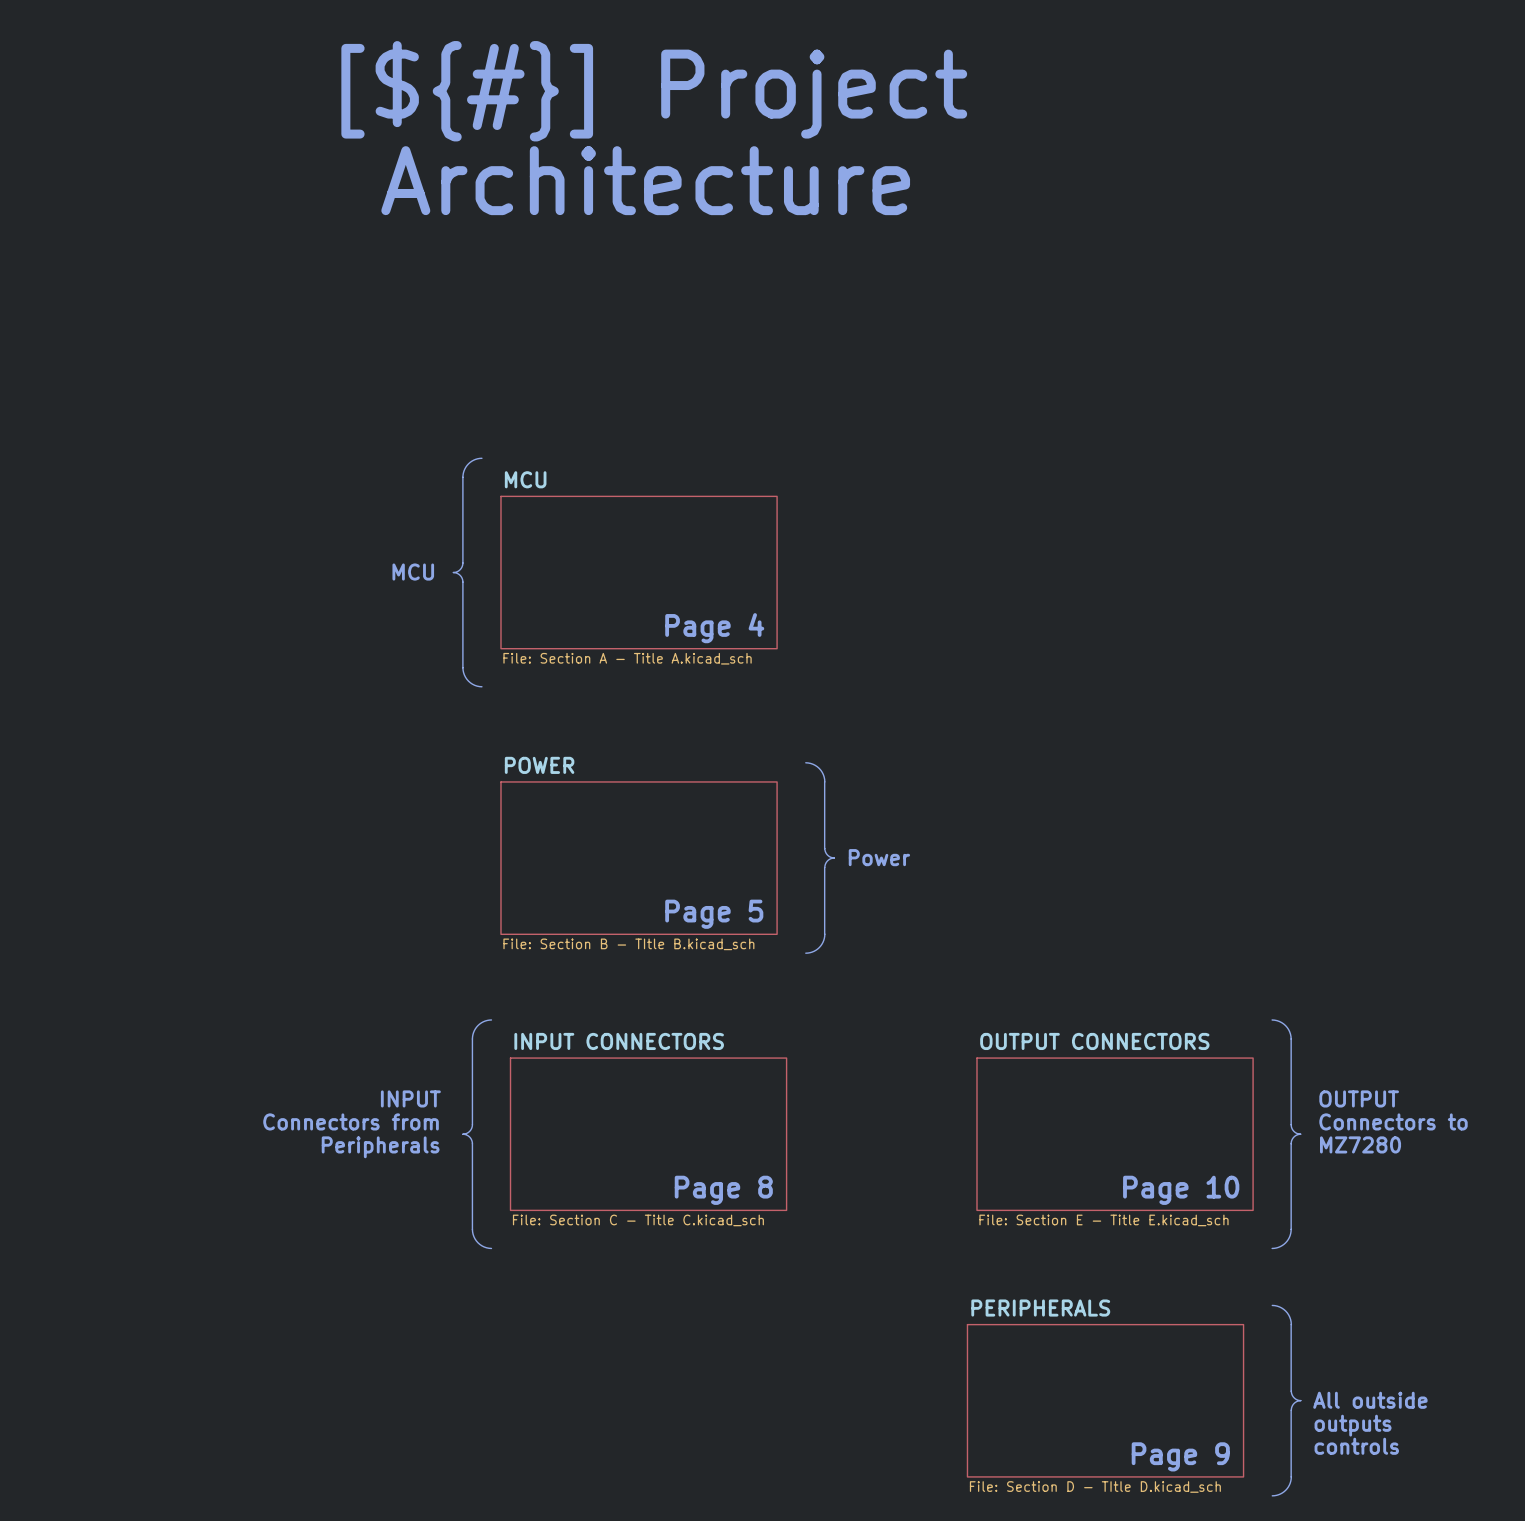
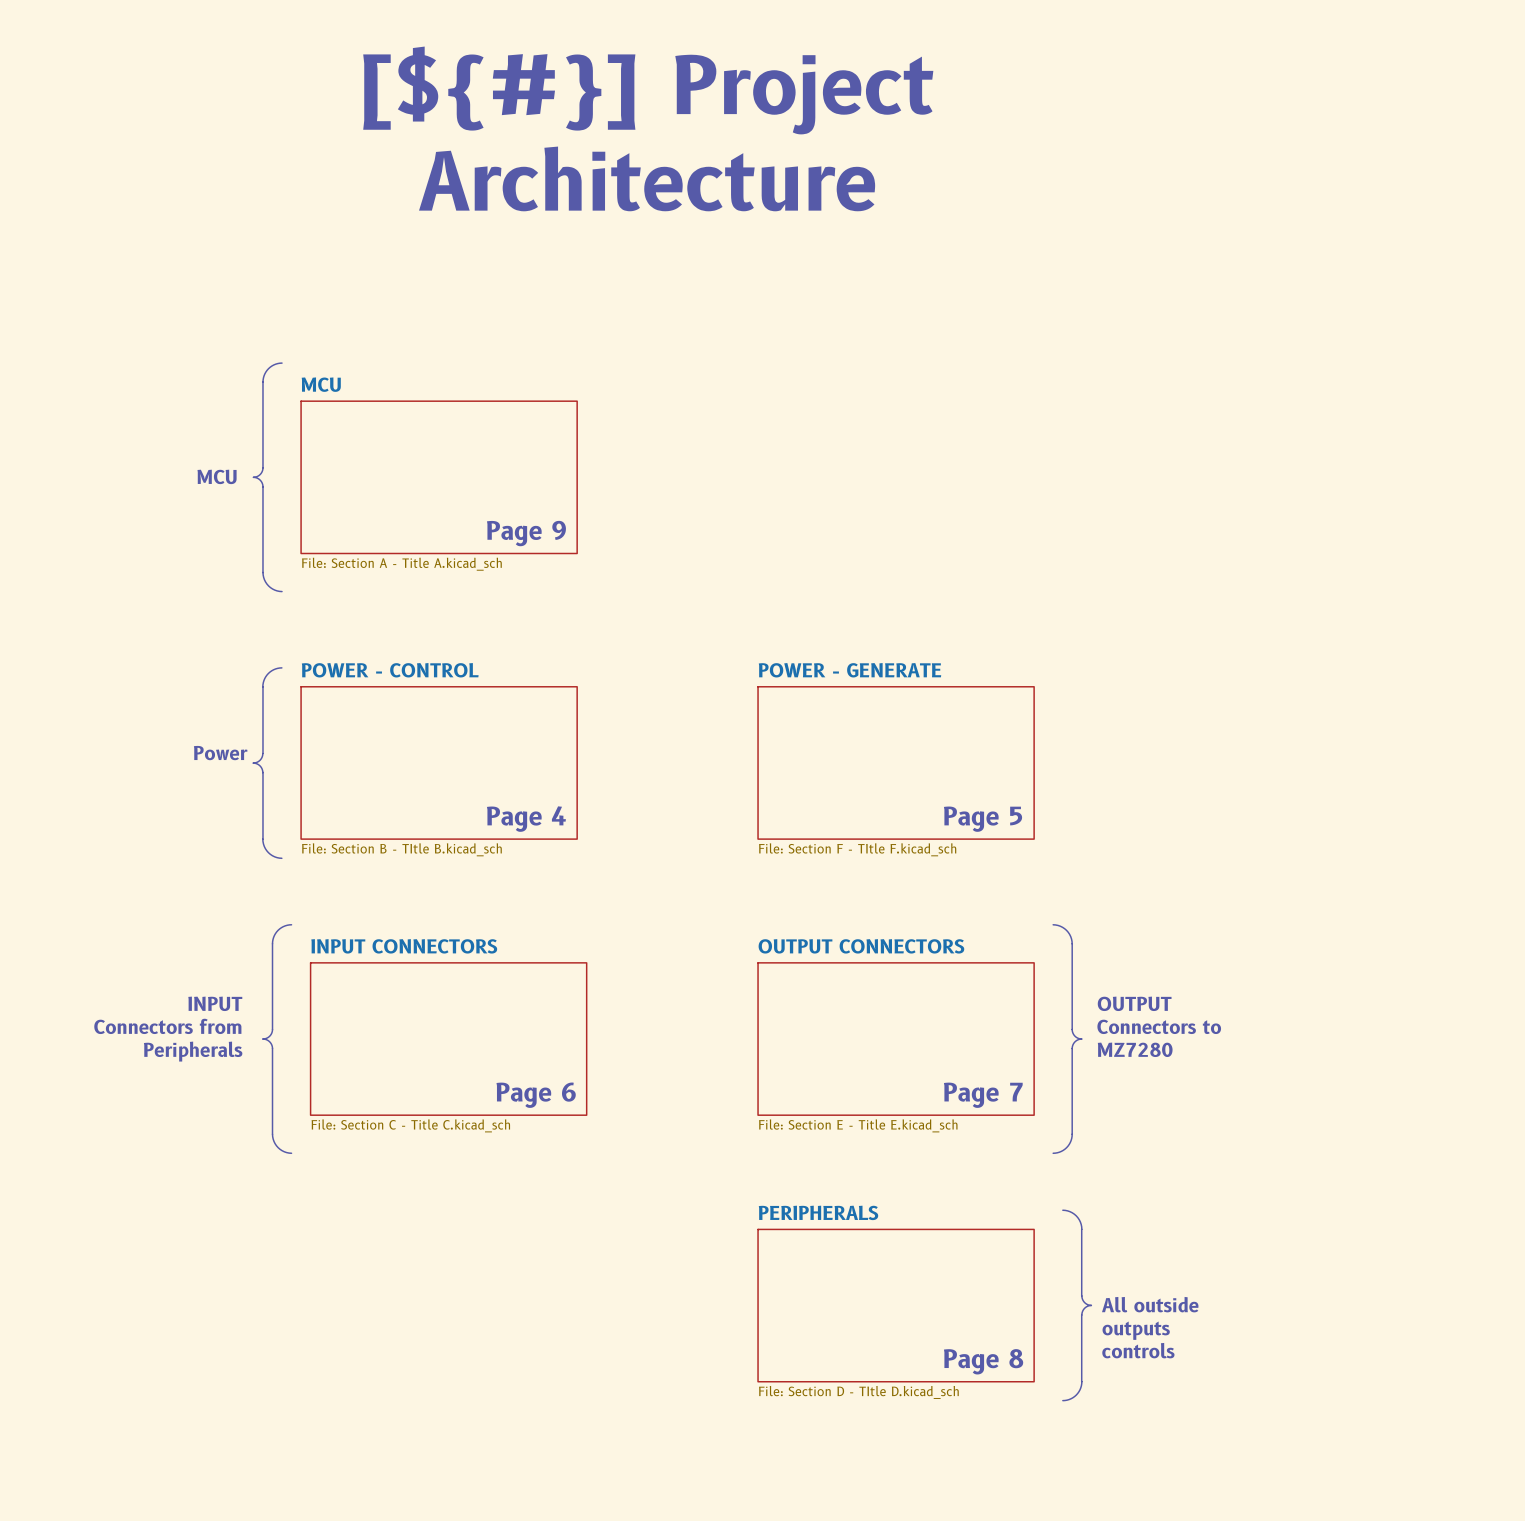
line: none -> (282, 363) (270, 367) (263, 377) (262, 469) (259, 475) (253, 477) (259, 479) (262, 485) (263, 577) (270, 587) (282, 591)
line: (481, 458) (470, 462) (463, 473) (462, 564) (459, 570) (453, 572) (459, 574) (462, 580) (463, 672) (470, 682) (481, 686) -> none
text: none -> MCU (217, 476)
sheet MCU: none -> File: Section A - Title A.kicad_sch (439, 477)
text: none -> Page 9 (526, 533)
text: MCU (413, 572) -> none
sheet MCU: File: Section A - Title A.kicad_sch (639, 572) -> none
text: Page 4 (714, 628) -> none
line: none -> (281, 667) (268, 673) (262, 686)
line: none -> (262, 686) (262, 753)
text: none -> Power (220, 753)
line: none -> (262, 753) (260, 760) (253, 763) (260, 765) (262, 772)
sheet POWER - CONTROL: none -> File: Section B - TItle B.kicad_sch (439, 762)
line: (805, 762) (819, 768) (824, 781) -> none
sheet POWER - GENERATE: none -> File: Section F - TItle F.kicad_sch (896, 762)
line: none -> (262, 772) (262, 839)
line: (824, 781) (824, 848) -> none
text: none -> Page 4 (526, 819)
text: none -> Page 5 (983, 819)
line: none -> (262, 839) (268, 852) (281, 858)
line: (824, 848) (827, 855) (834, 857) (827, 860) (824, 867) -> none
text: Power (879, 857) -> none
sheet POWER: File: Section B - TItle B.kicad_sch (639, 858) -> none
line: (824, 867) (824, 934) -> none
text: Page 5 (714, 914) -> none
line: none -> (291, 924) (279, 928) (272, 939) (272, 1030) (268, 1037) (262, 1039) (268, 1041) (272, 1047) (273, 1139) (279, 1149) (291, 1153)
line: none -> (1053, 924) (1064, 928) (1071, 938) (1072, 1030) (1075, 1036) (1081, 1039) (1075, 1041) (1072, 1047) (1071, 1138) (1065, 1149) (1053, 1153)
line: (824, 934) (819, 947) (805, 953) -> none
text: none -> INPUT (215, 1003)
text: none -> OUTPUT (1134, 1003)
line: (491, 1019) (479, 1024) (472, 1034) (472, 1125) (468, 1132) (462, 1134) (469, 1137) (472, 1142) (473, 1234) (479, 1244) (491, 1248) -> none
line: (1272, 1019) (1283, 1023) (1290, 1034) (1291, 1125) (1293, 1131) (1300, 1134) (1294, 1136) (1291, 1142) (1290, 1233) (1283, 1244) (1272, 1248) -> none
text: none -> Connectors from (167, 1026)
text: none -> Connectors to (1159, 1026)
sheet INPUT CONNECTORS: none -> File: Section C - Title C.kicad_sch (448, 1039)
sheet OUTPUT CONNECTORS: none -> File: Section E - Title E.kicad_sch (896, 1039)
text: none -> MZ7280 (1135, 1049)
text: none -> Peripherals (193, 1051)
text: none -> Page 6 (536, 1095)
text: none -> Page 7 (983, 1095)
text: INPUT (410, 1098) -> none
text: OUTPUT (1359, 1098) -> none
text: Connectors from (351, 1121) -> none
text: Connectors to (1393, 1121) -> none
sheet INPUT CONNECTORS: File: Section C - Title C.kicad_sch (648, 1134) -> none
sheet OUTPUT CONNECTORS: File: Section E - Title E.kicad_sch (1115, 1134) -> none
text: MZ7280 (1360, 1144) -> none
text: Peripherals (380, 1147) -> none
text: Page 8 (723, 1190) -> none
text: Page 10 (1181, 1190) -> none
line: none -> (1062, 1210) (1076, 1215) (1081, 1229)
line: none -> (1081, 1229) (1081, 1296)
line: none -> (1081, 1295) (1084, 1302) (1091, 1305) (1084, 1308) (1081, 1314)
sheet PERIPHERALS: none -> File: Section D - TItle D.kicad_sch (896, 1305)
text: none -> All outside (1150, 1304)
line: (1272, 1305) (1285, 1311) (1291, 1324) -> none
line: none -> (1081, 1315) (1081, 1381)
line: (1291, 1324) (1291, 1391) -> none
text: none -> outputs (1136, 1330)
text: none -> controls (1138, 1350)
text: none -> Page 8 (983, 1361)
line: none -> (1081, 1381) (1076, 1395) (1062, 1400)
line: (1291, 1391) (1294, 1397) (1300, 1400) (1294, 1403) (1291, 1410) -> none
sheet PERIPHERALS: File: Section D - TItle D.kicad_sch (1105, 1400) -> none
text: All outside (1370, 1400) -> none
line: (1291, 1410) (1291, 1476) -> none
text: outputs (1353, 1425) -> none
text: controls (1356, 1446) -> none
text: Page 9 (1180, 1456) -> none
line: (1291, 1476) (1285, 1490) (1272, 1495) -> none

